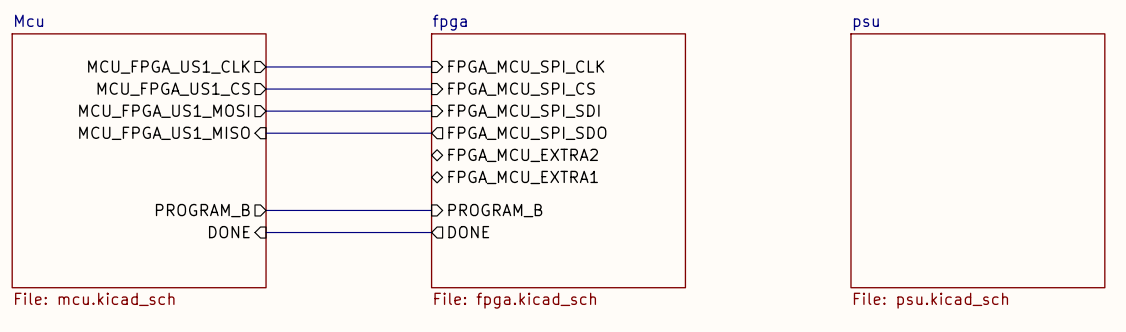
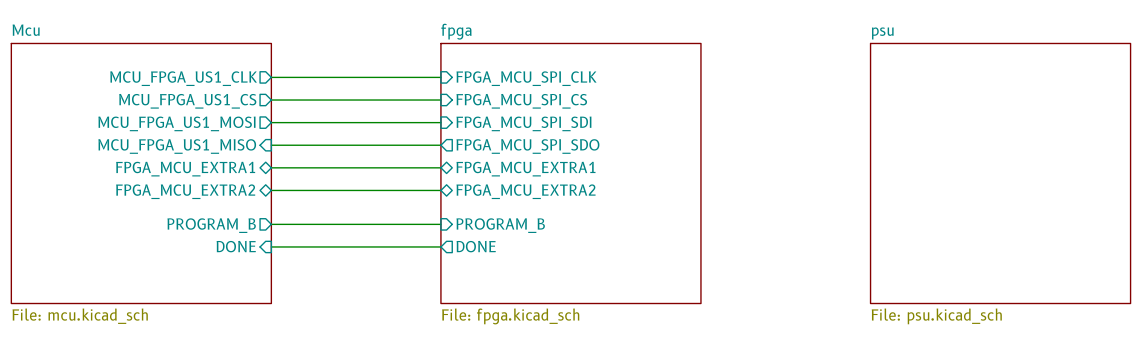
sheet pin: none -> FPGA_MCU_EXTRA1 (185, 169)
wire: none -> (271, 167) (440, 167)
sheet pin: FPGA_MCU_EXTRA2 (523, 155) -> FPGA_MCU_EXTRA1 (525, 169)
sheet pin: none -> FPGA_MCU_EXTRA2 (185, 191)
wire: none -> (271, 190) (440, 190)
sheet pin: FPGA_MCU_EXTRA1 (523, 177) -> FPGA_MCU_EXTRA2 (526, 191)

